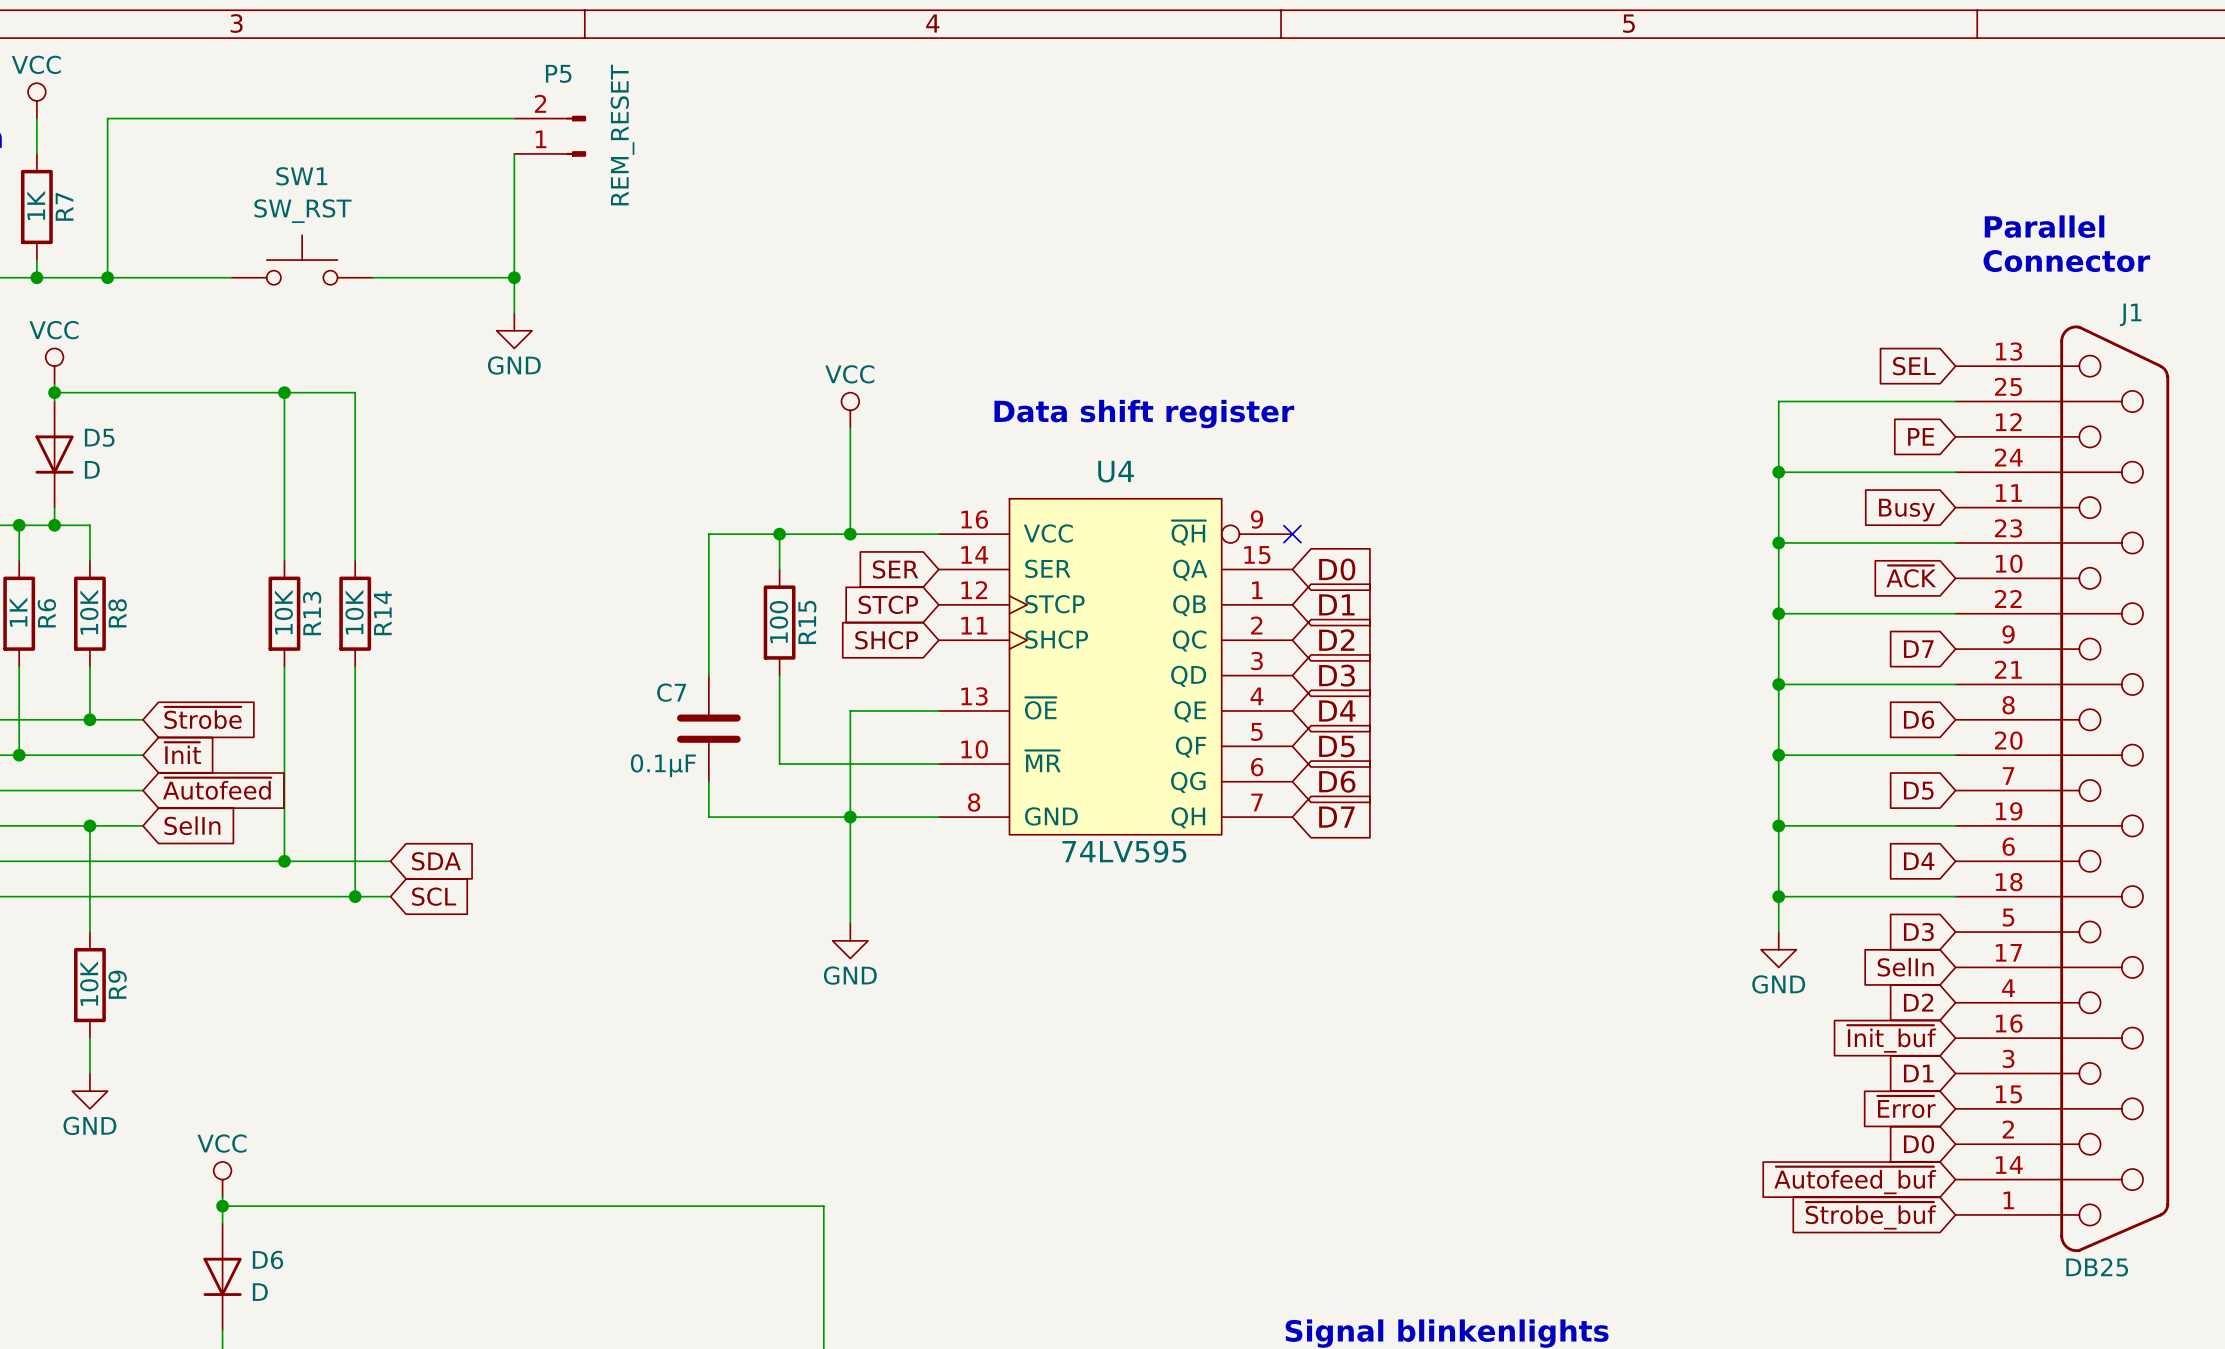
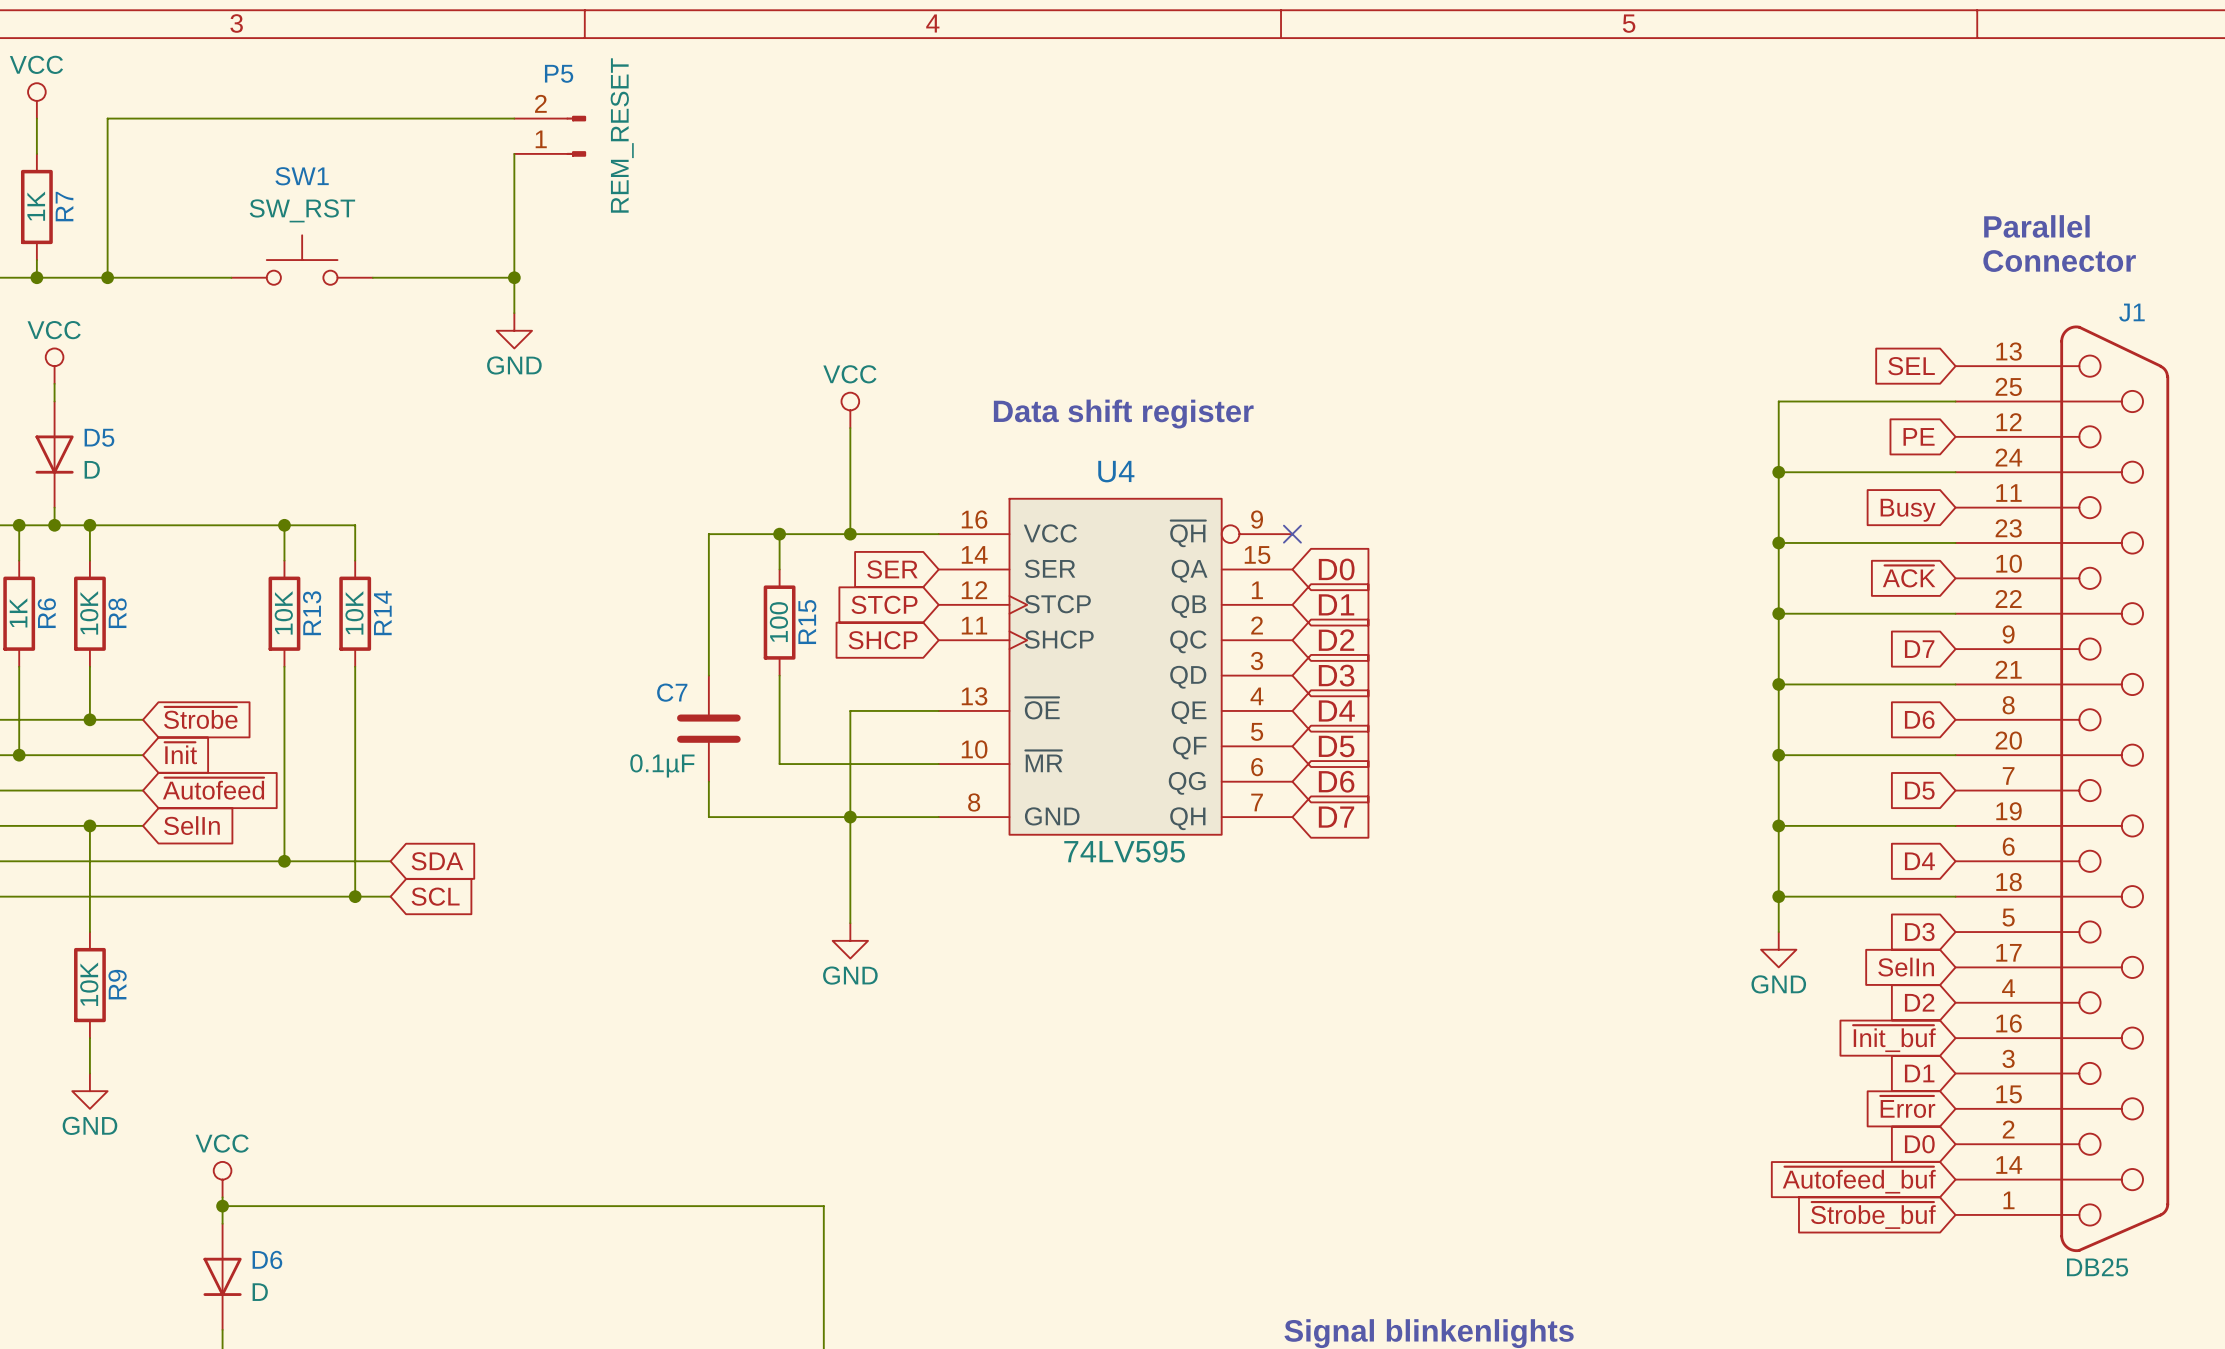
wire: (54, 392) (355, 392) (355, 525) -> (89, 525) (355, 525)
junction: (54, 392) -> none
wire: (284, 392) (284, 525) -> none
junction: (284, 392) -> none
junction: none -> (89, 525)
junction: none -> (284, 525)

